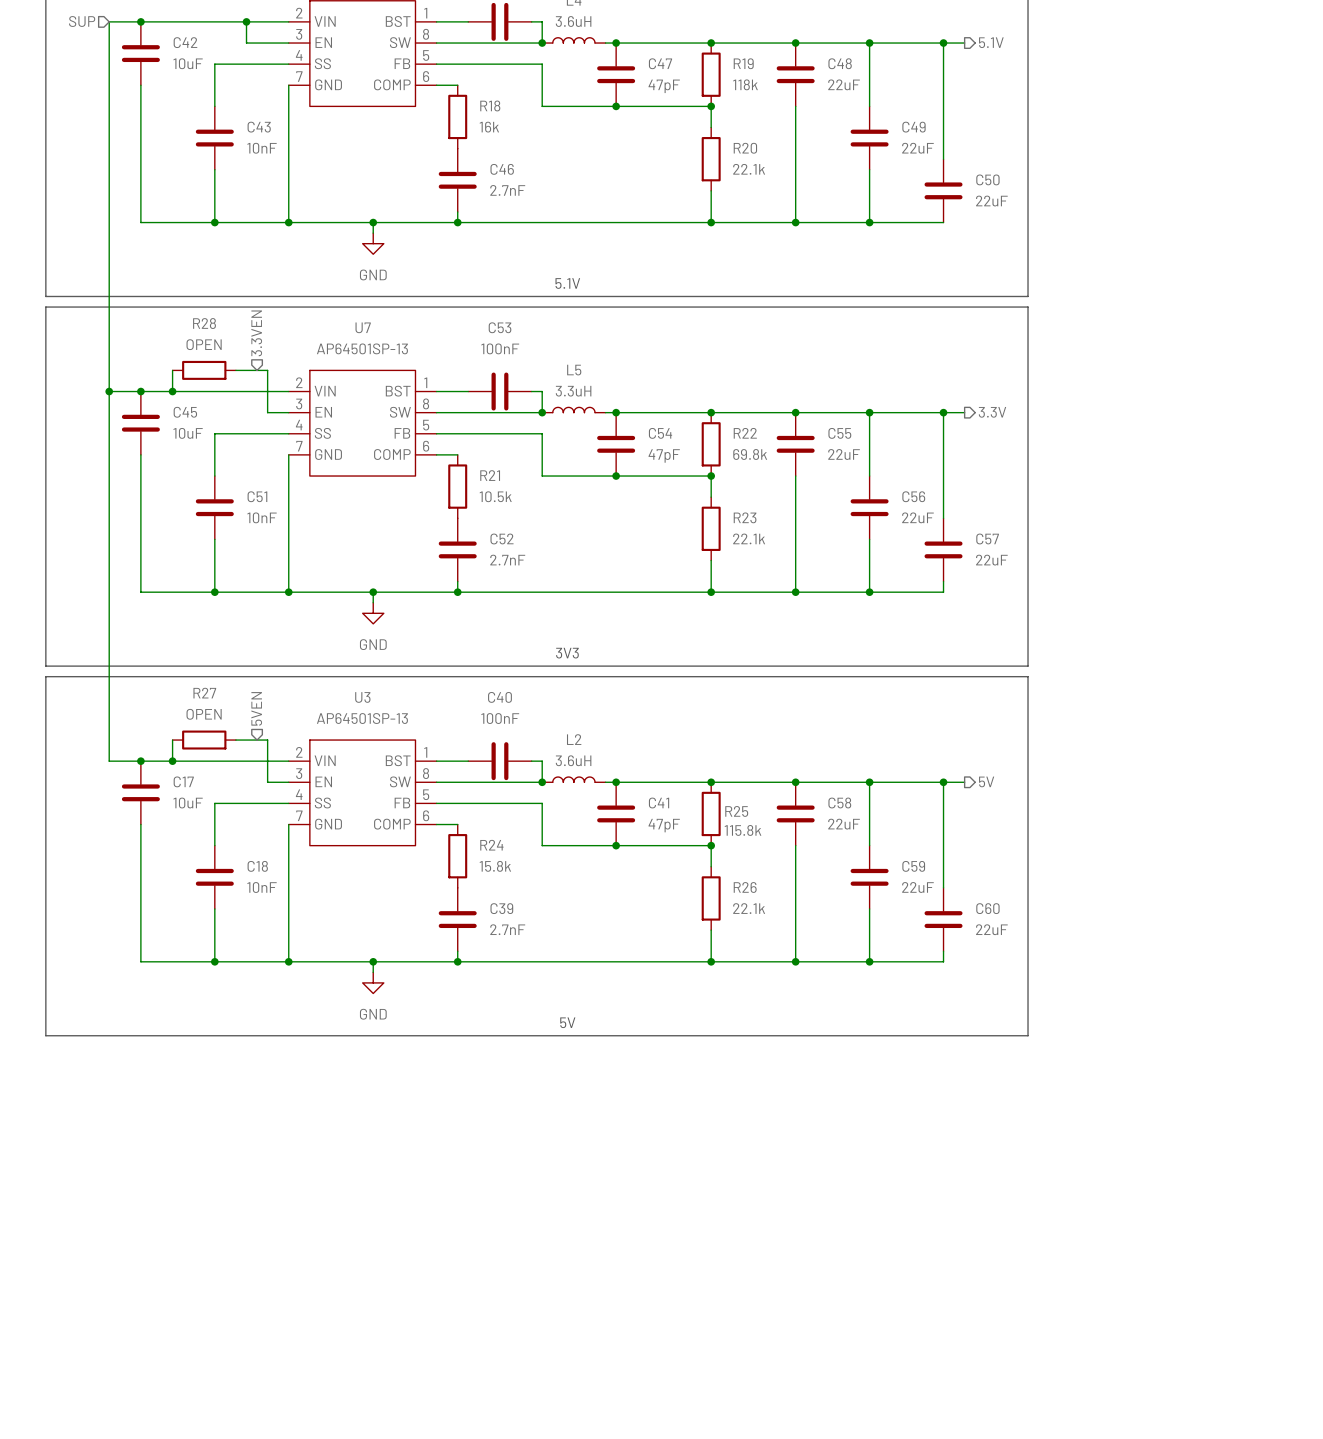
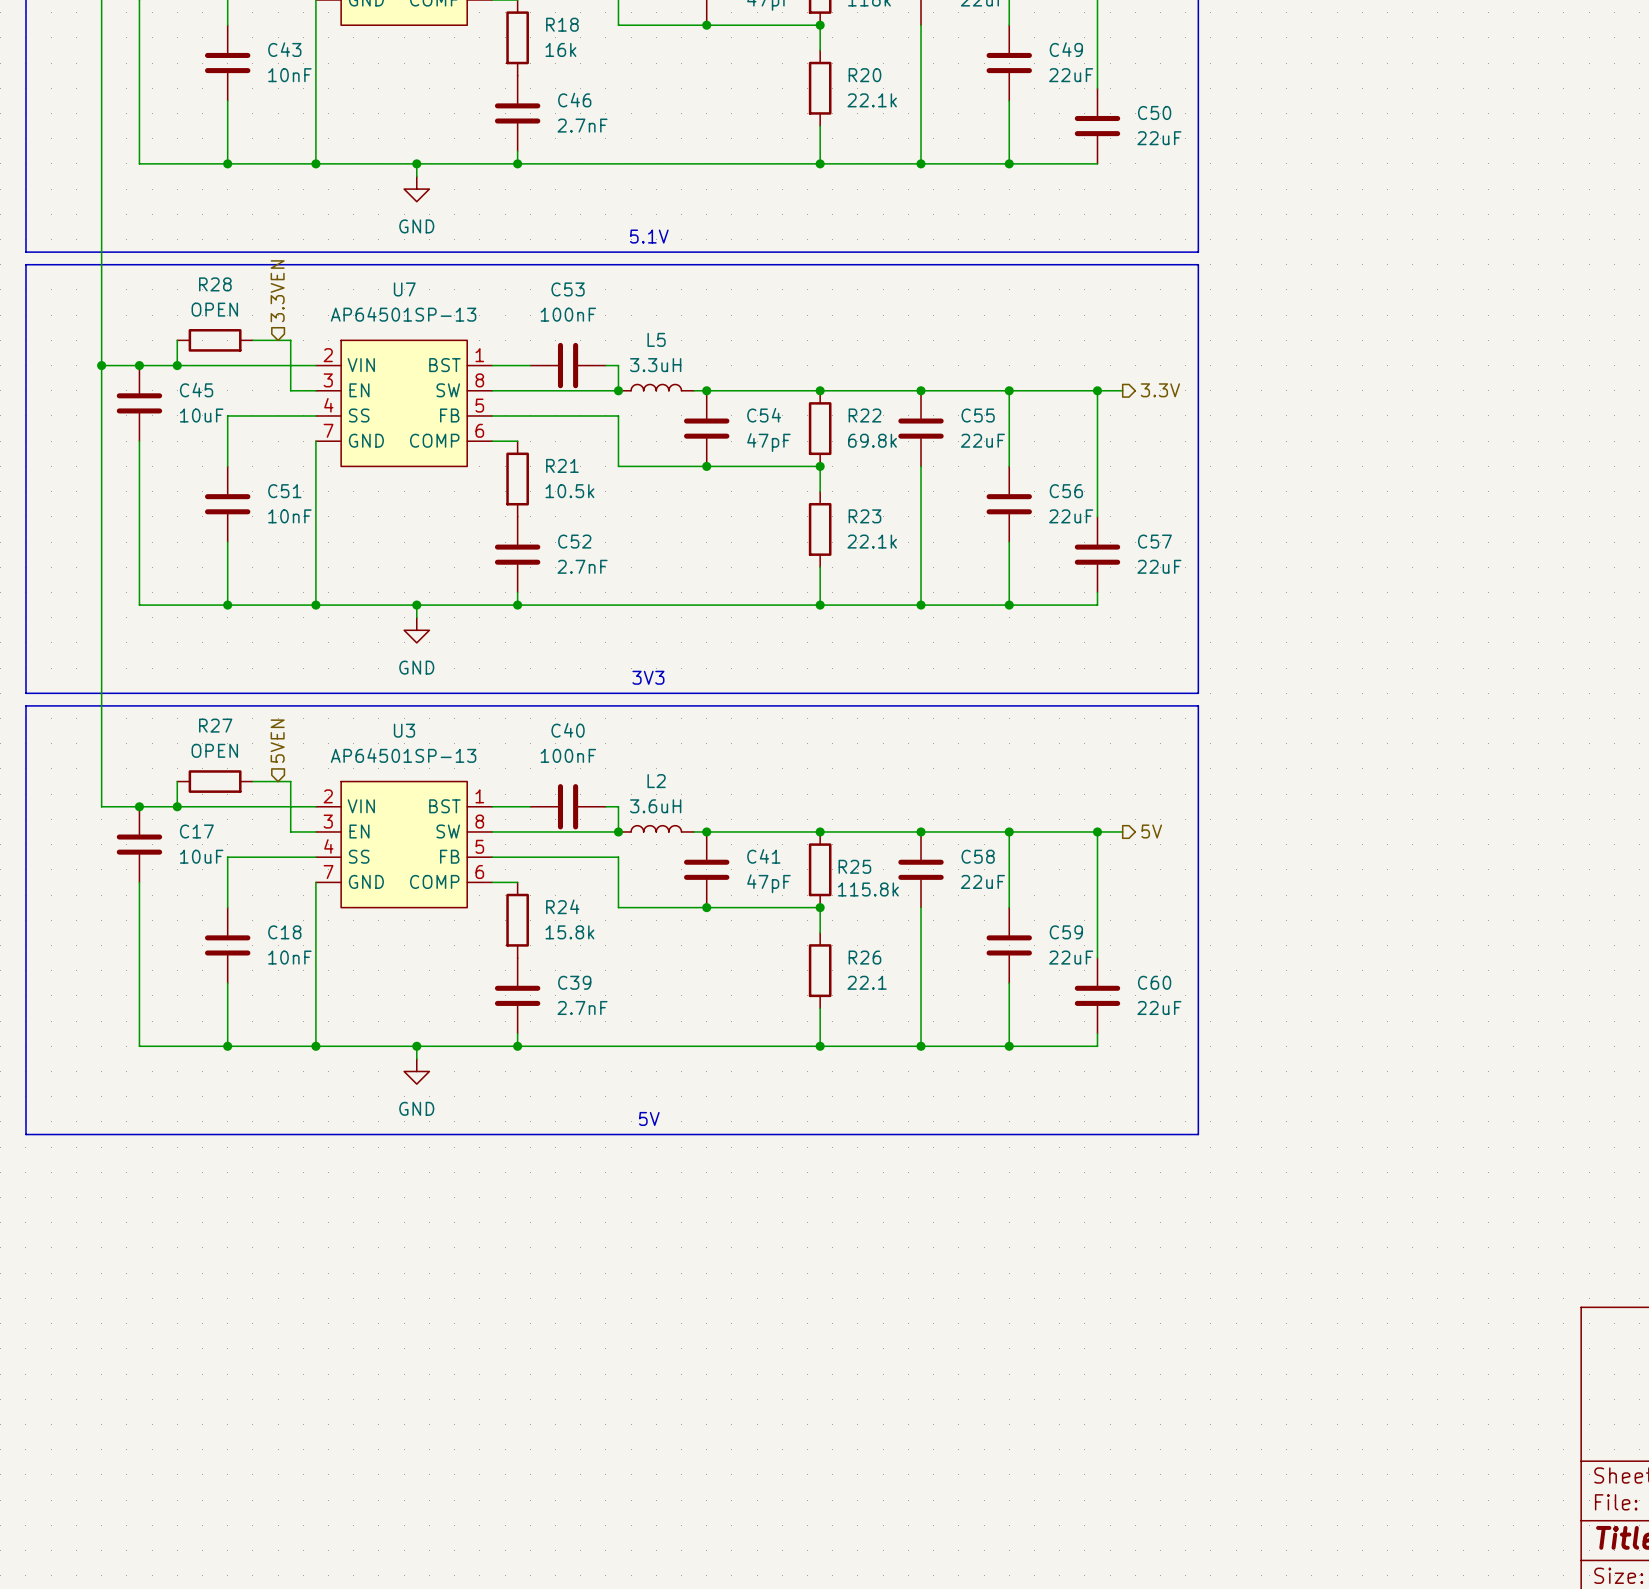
R26 value: 22.1k (749, 908) -> 22.1 (867, 982)

